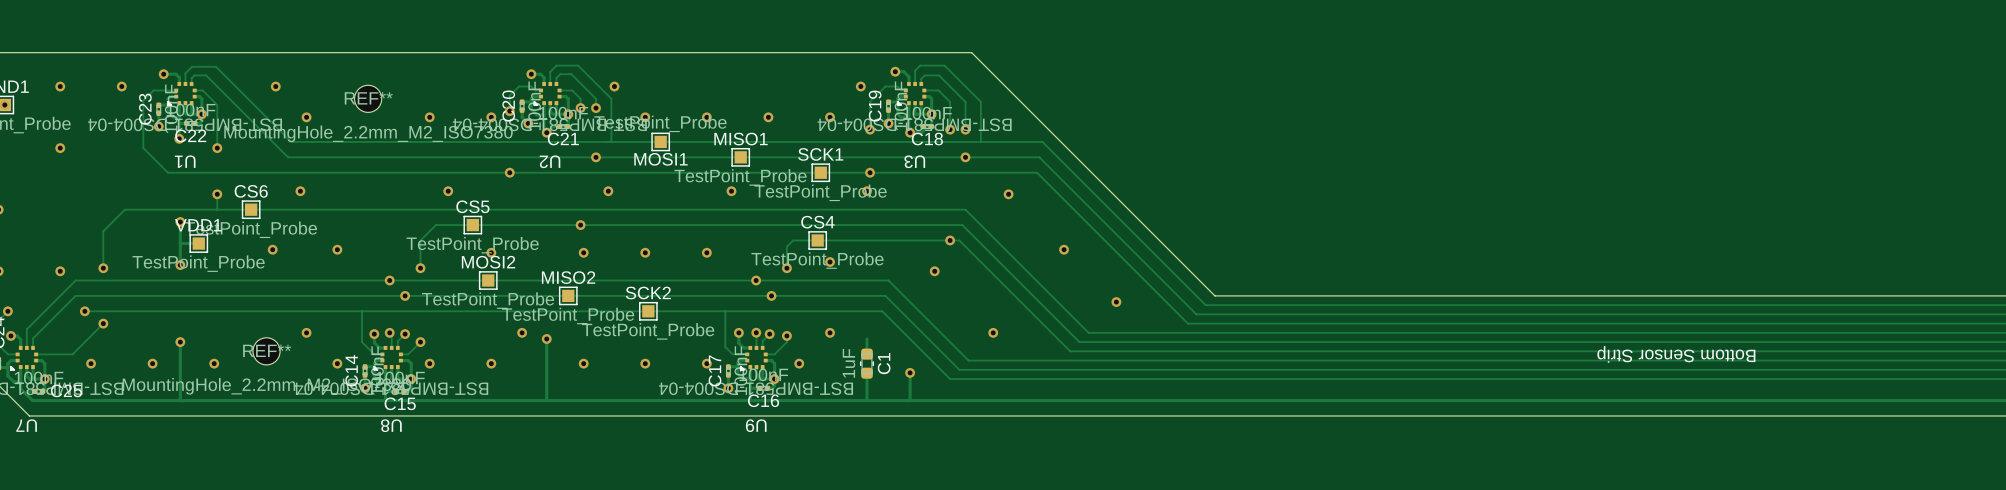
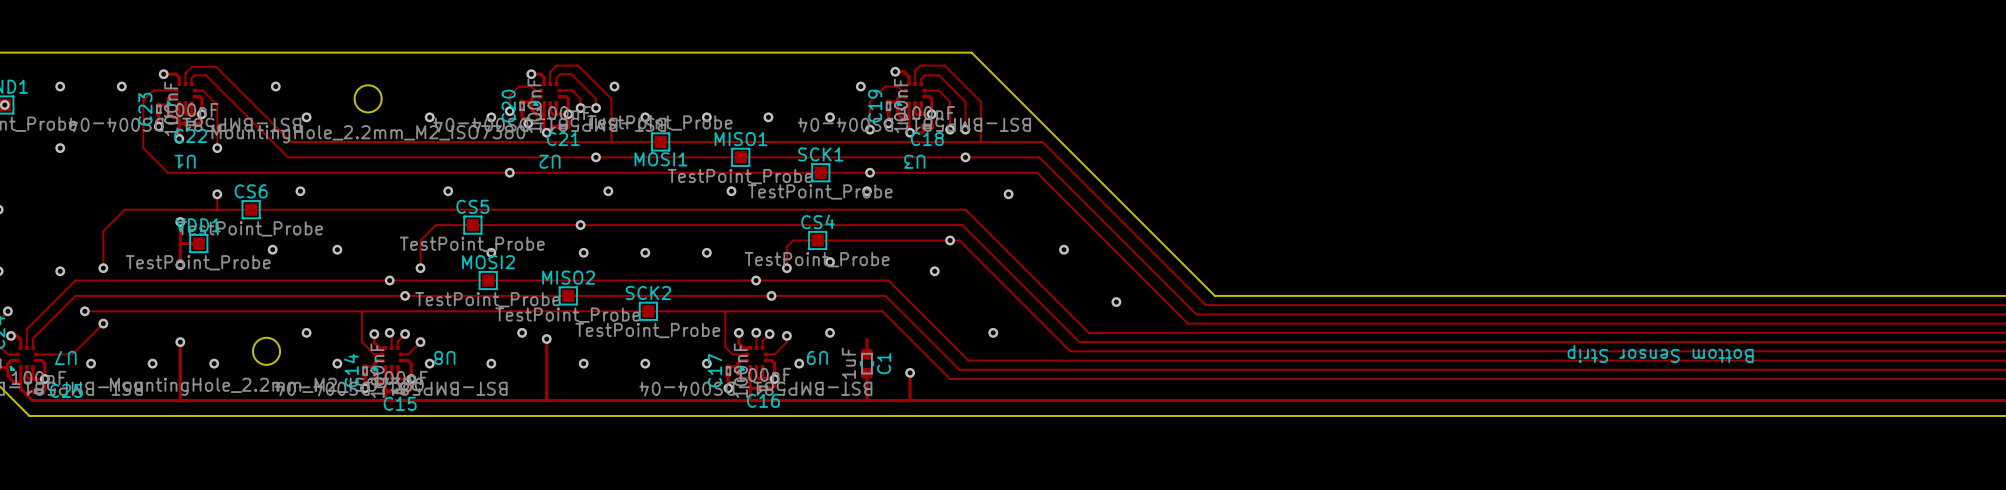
REF** name: REF** (368, 98) -> none
REF** name: REF** (267, 350) -> none
U7 name position: U7 (26, 425) -> U7 (65, 357)
U8 name position: U8 (391, 425) -> U8 (444, 357)
U9 name position: U9 (756, 425) -> U9 (817, 357)

